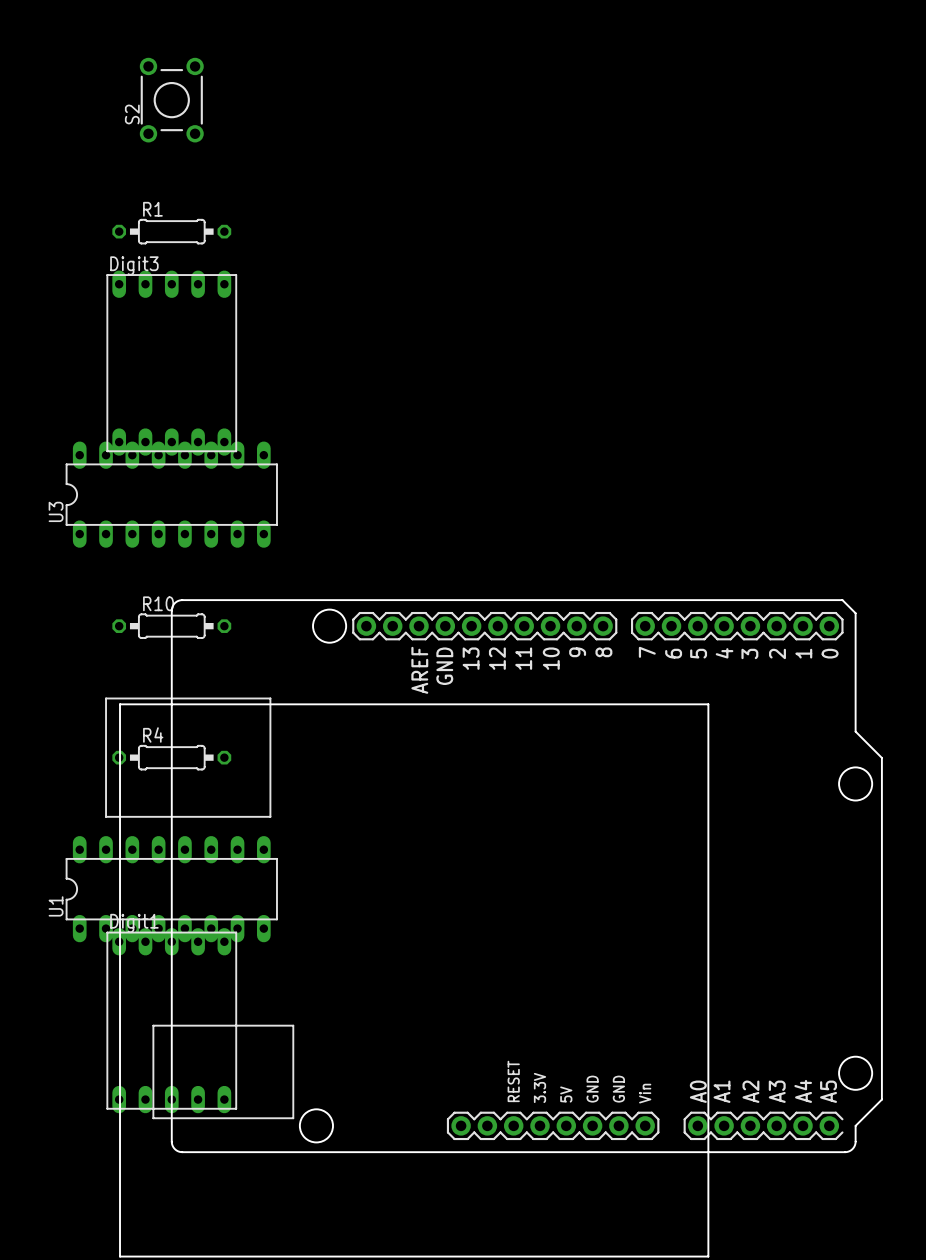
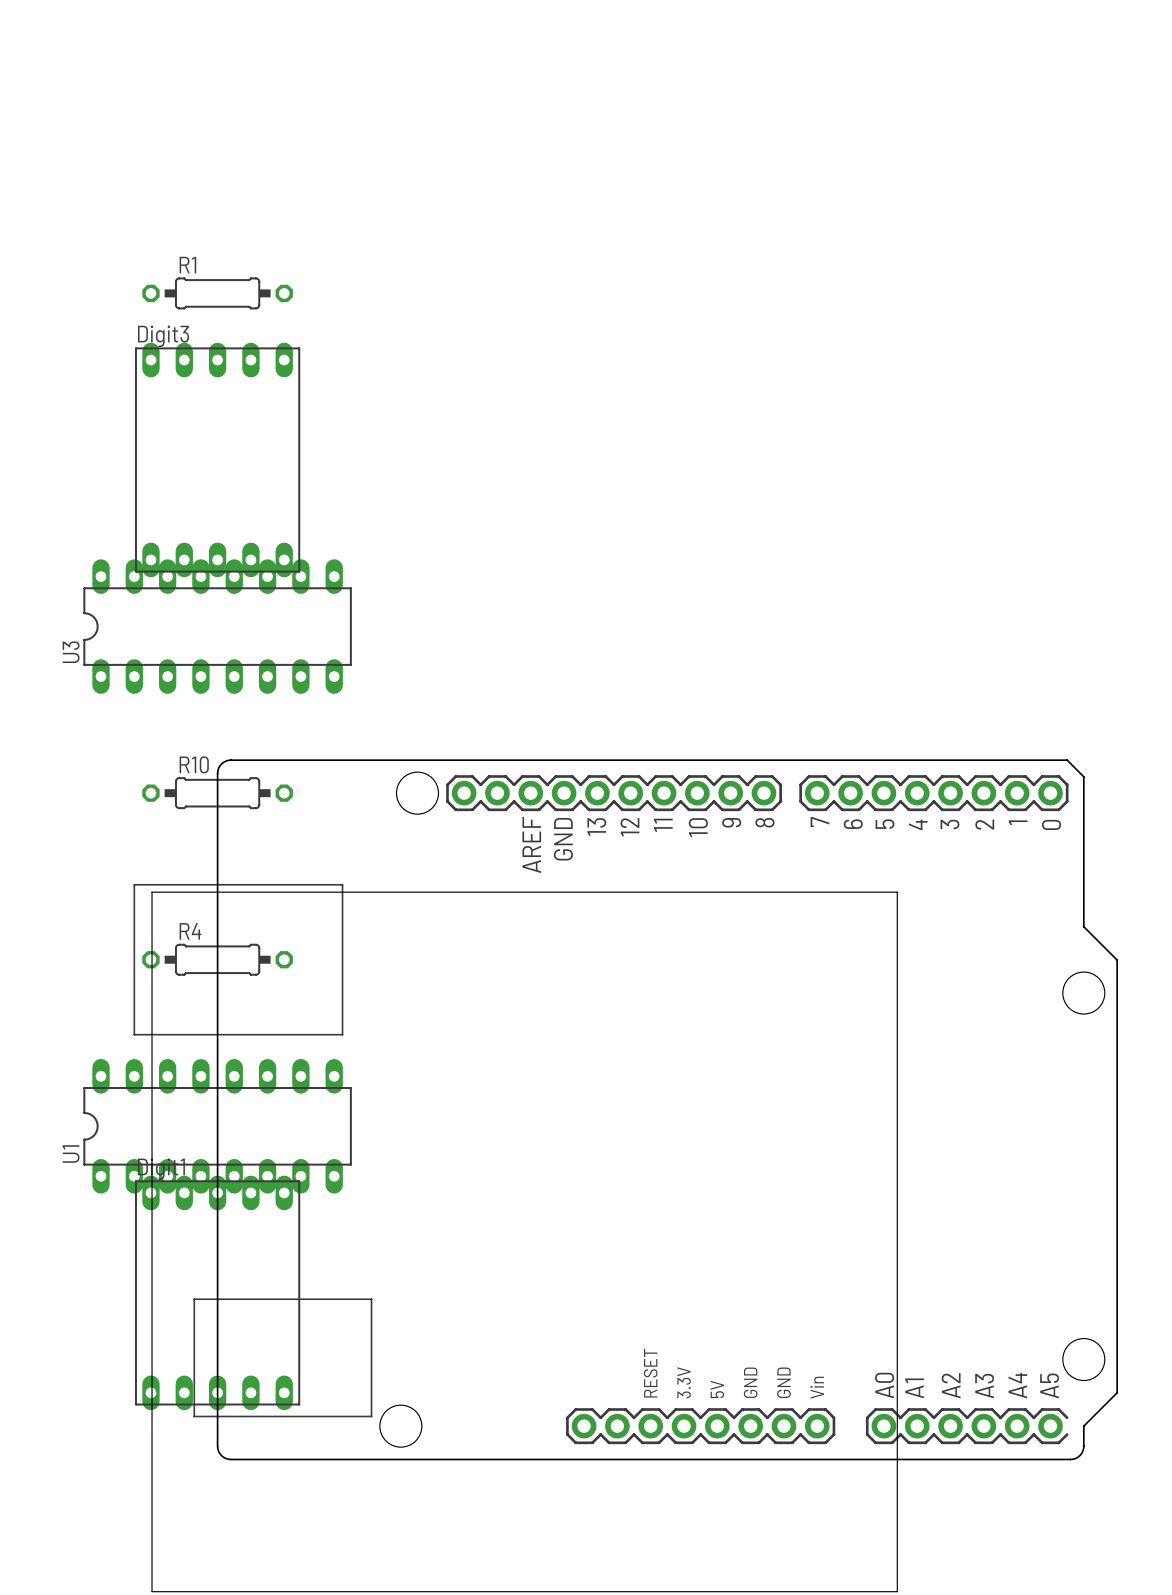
S2: (171, 100) -> none

